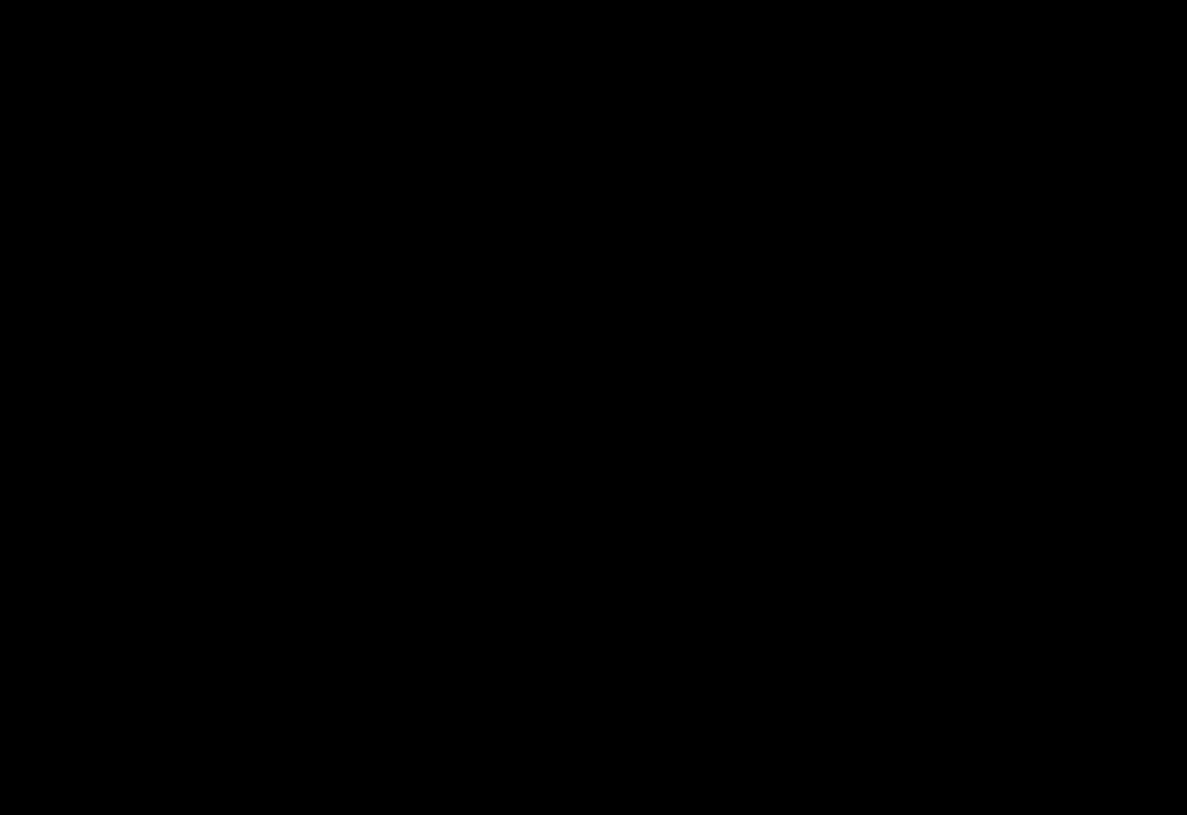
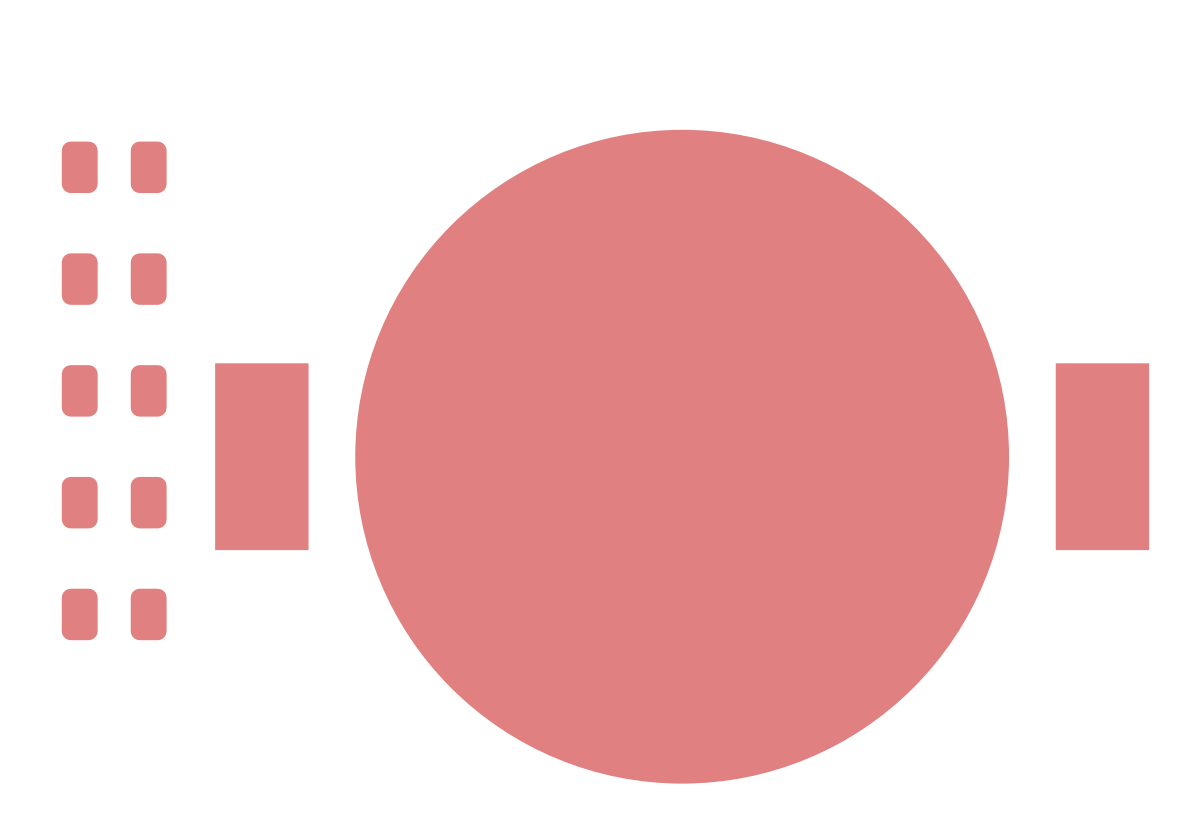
part: none -> (114, 167)
part: none -> (114, 279)
part: none -> (114, 390)
part: none -> (682, 456)
part: none -> (114, 502)
part: none -> (114, 614)

